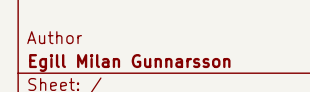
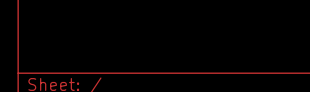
title block: Author (54, 37) -> none
title block: Egill Milan Gunnarsson (129, 63) -> none

